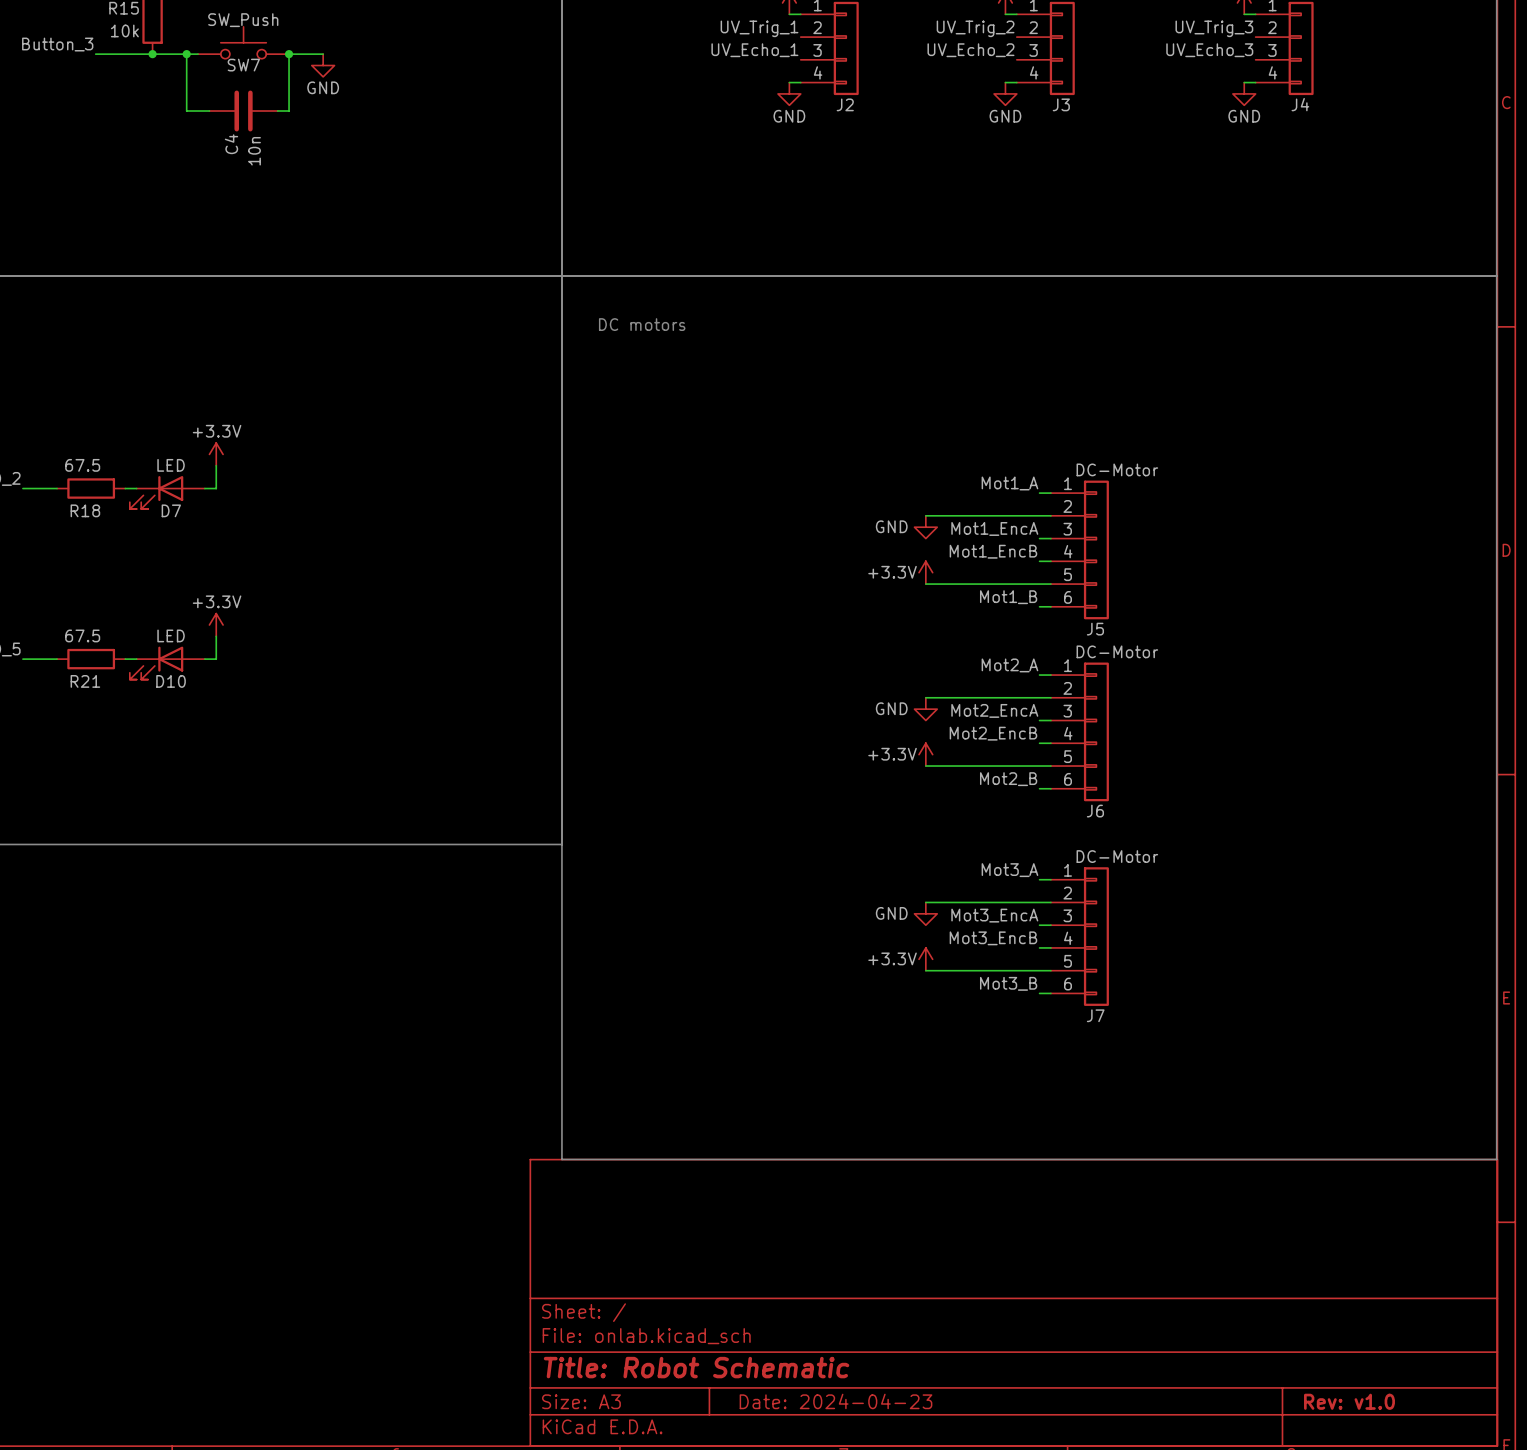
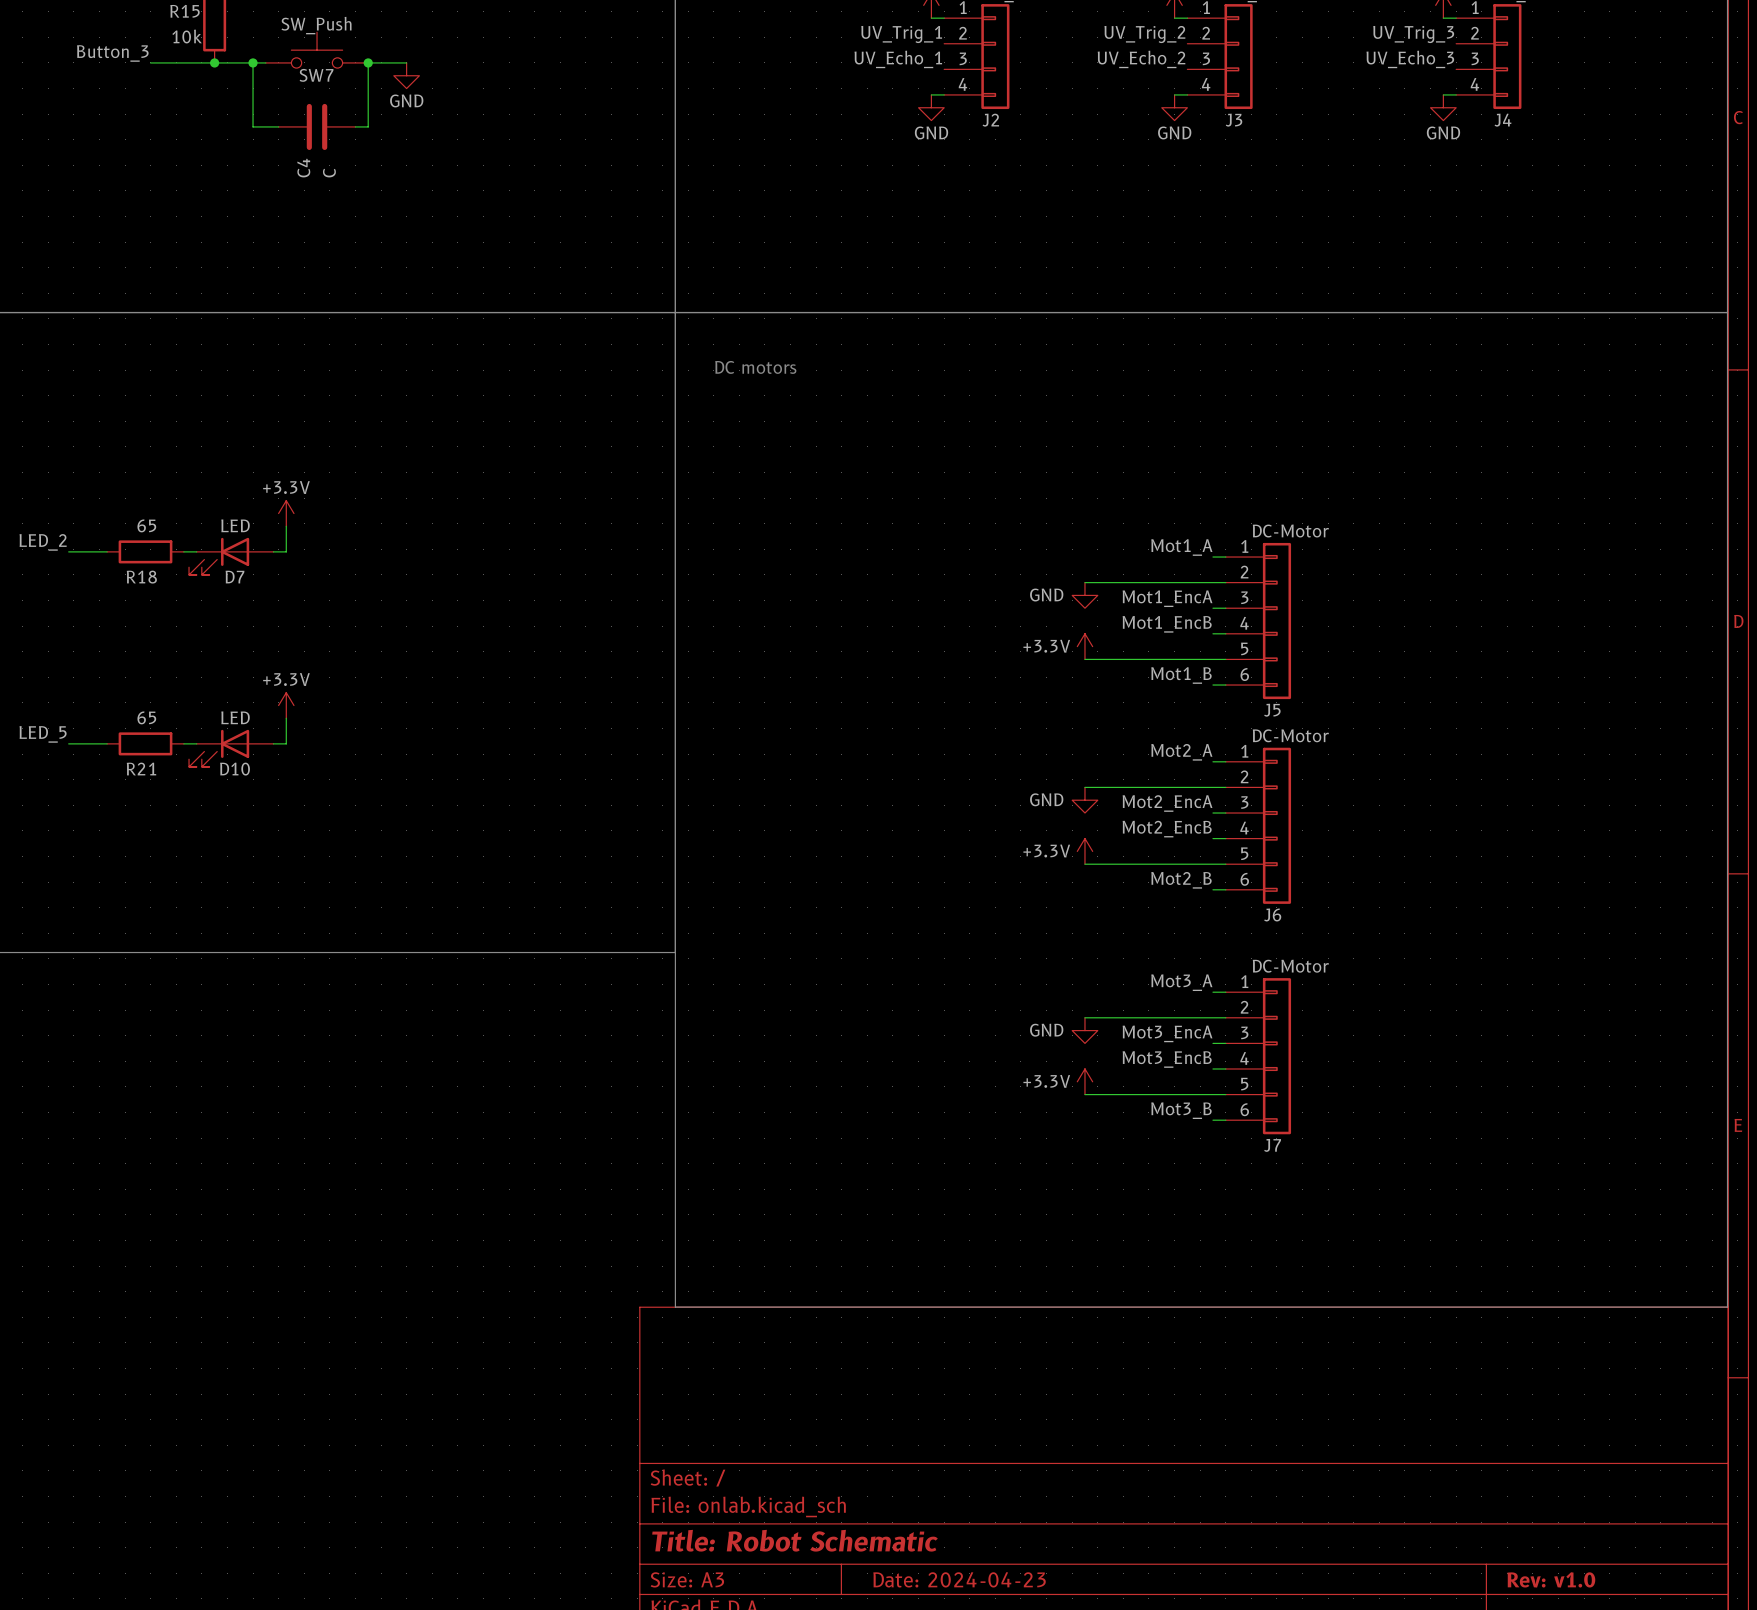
C4 value: 10n (254, 151) -> C (329, 173)
R18 value: 67.5 (82, 465) -> 65 (146, 525)
R21 value: 67.5 (82, 635) -> 65 (146, 717)

